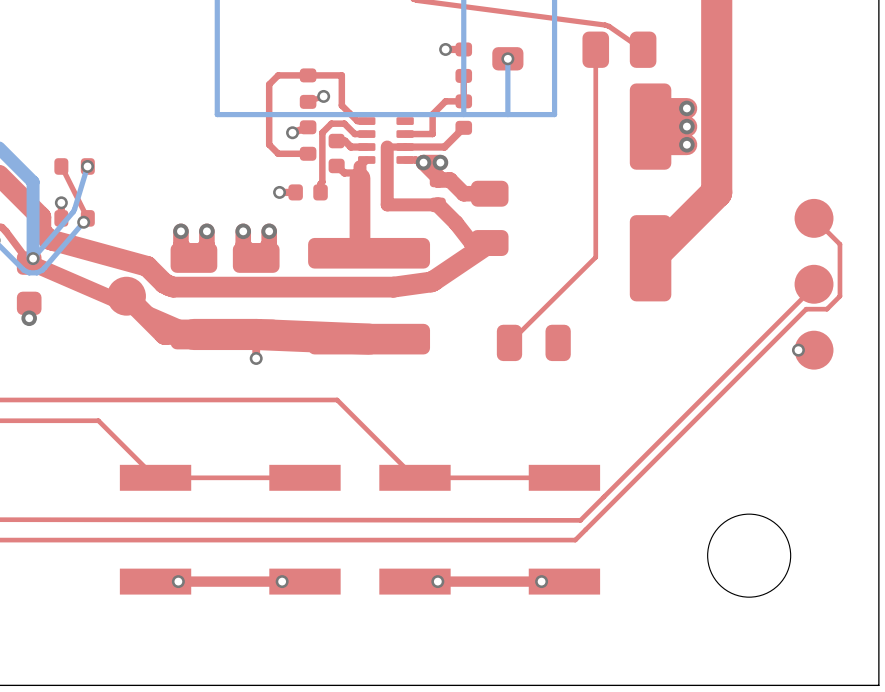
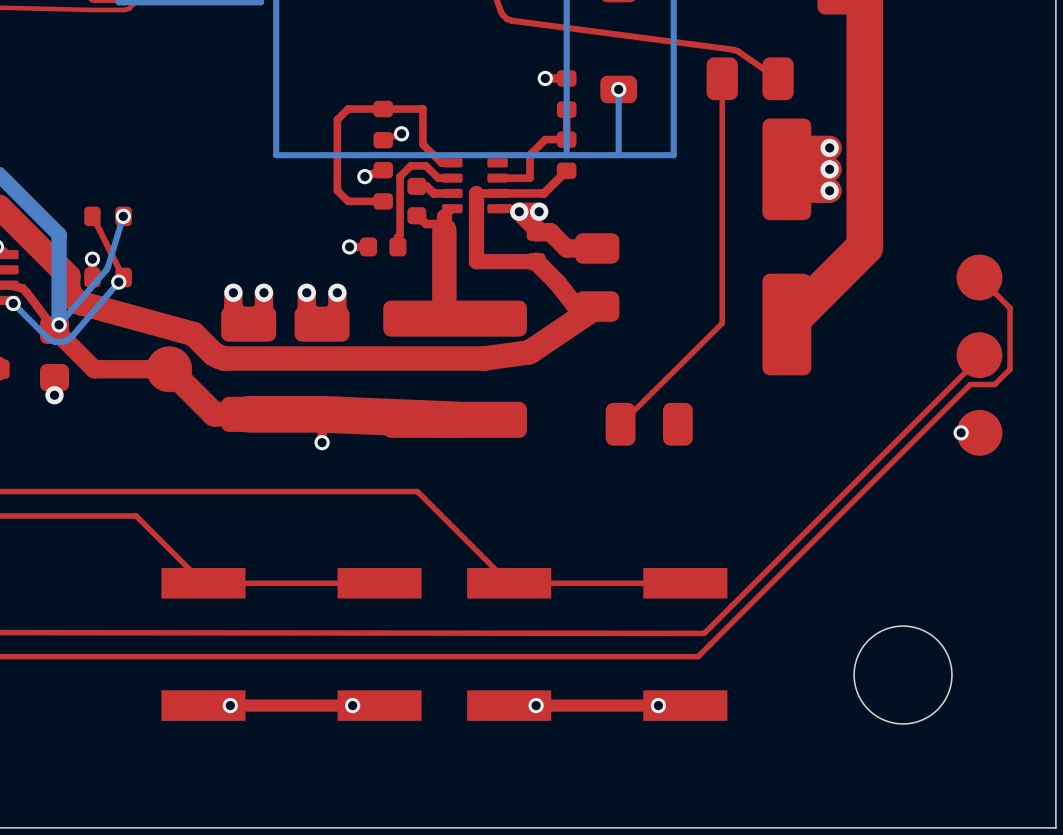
top track: (29, 262) (193, 334) -> (54, 329) (94, 369) (169, 369)

